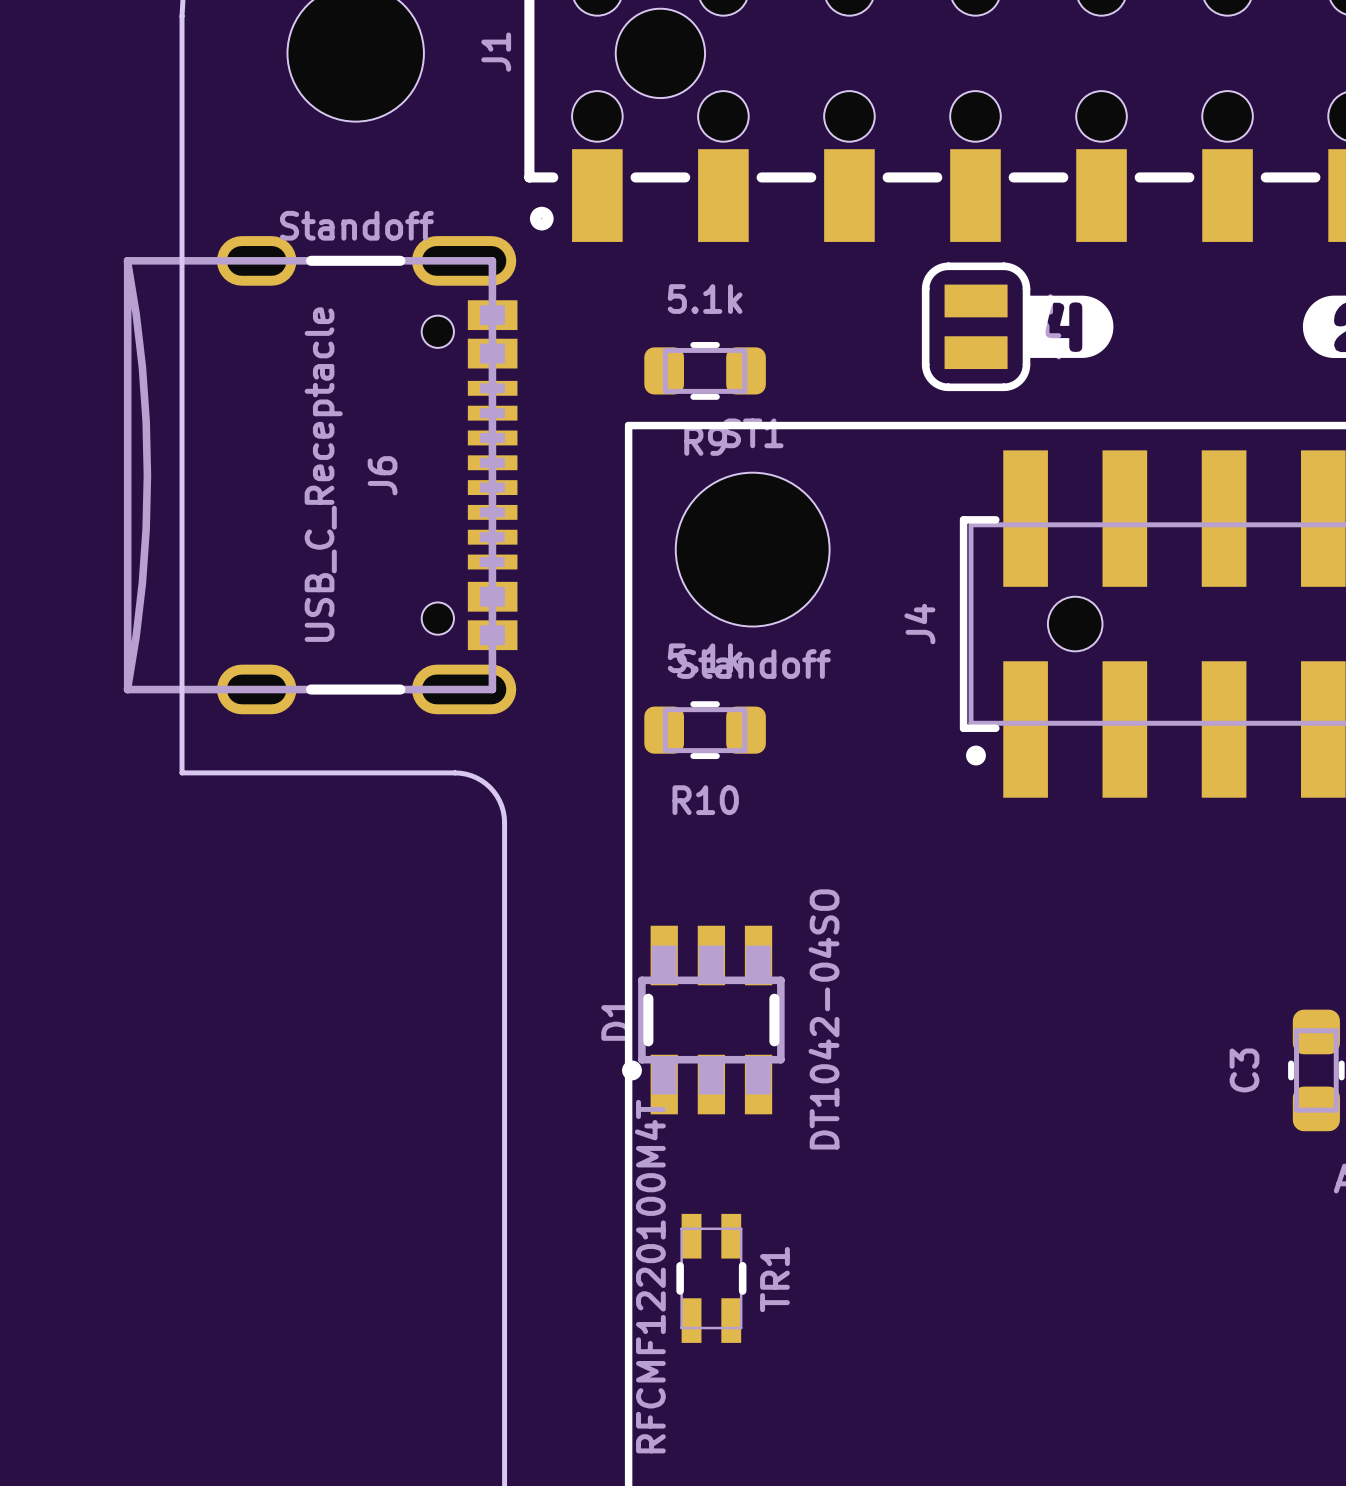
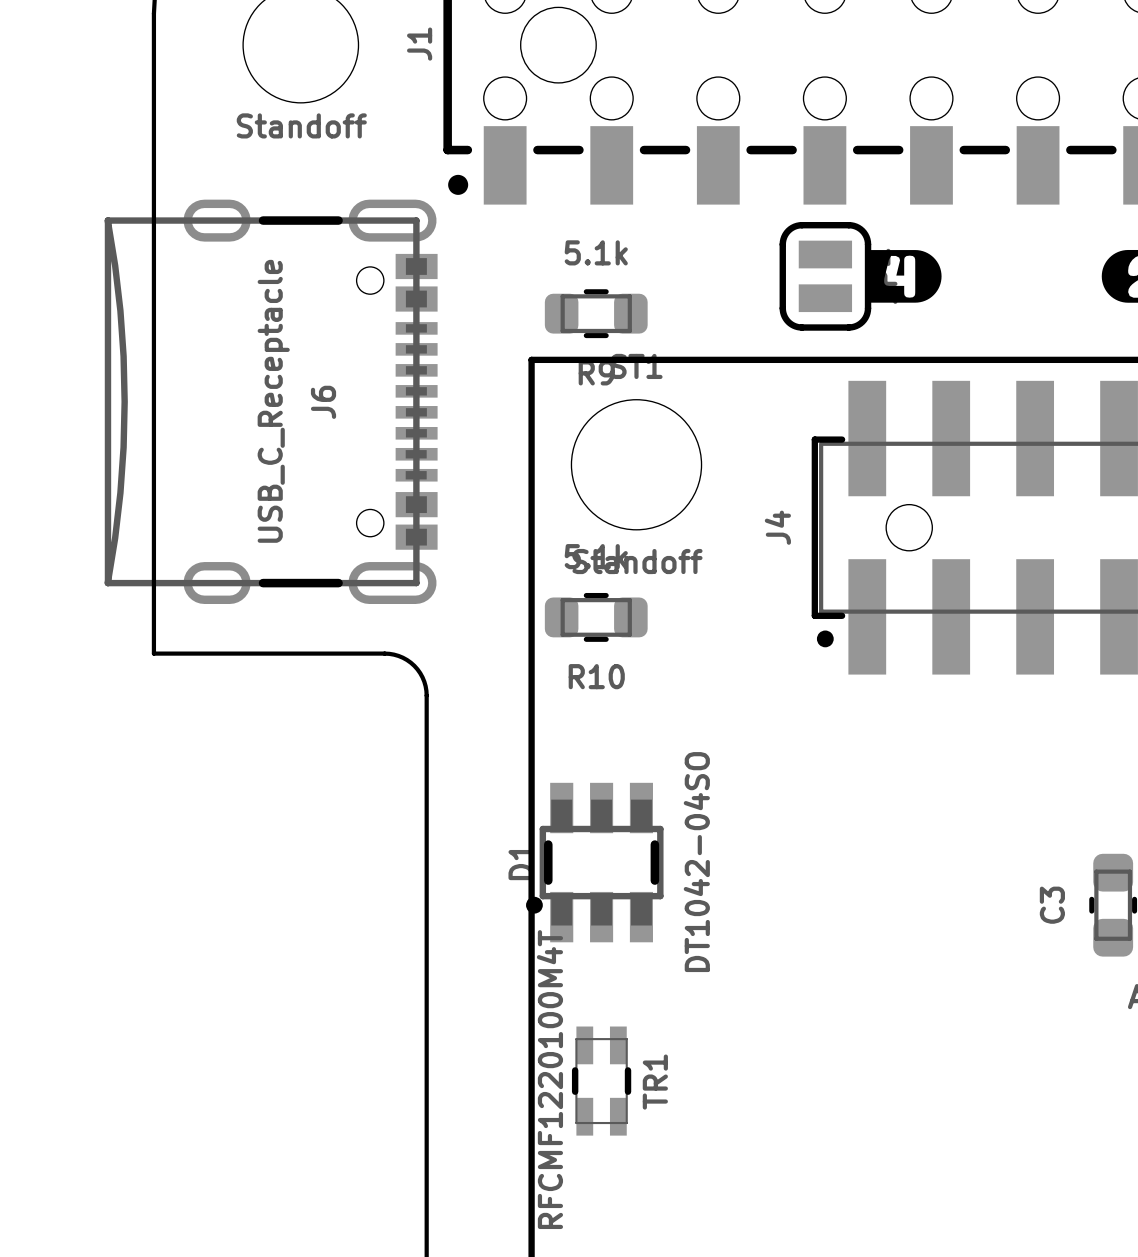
part value position: Standoff (356, 225) -> Standoff (301, 125)

